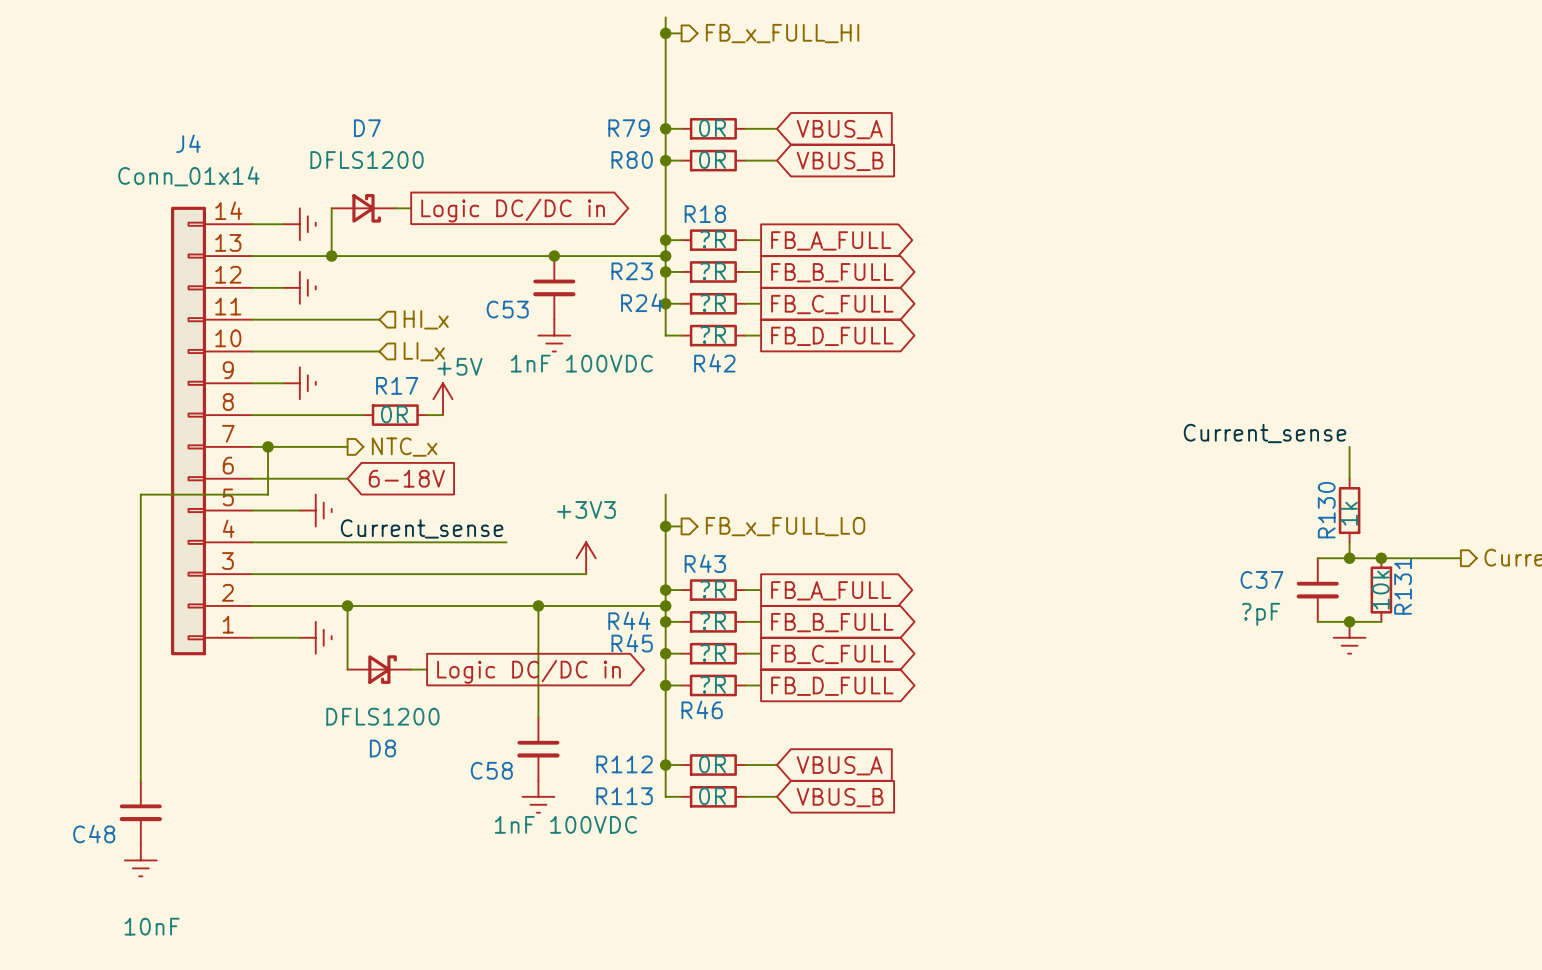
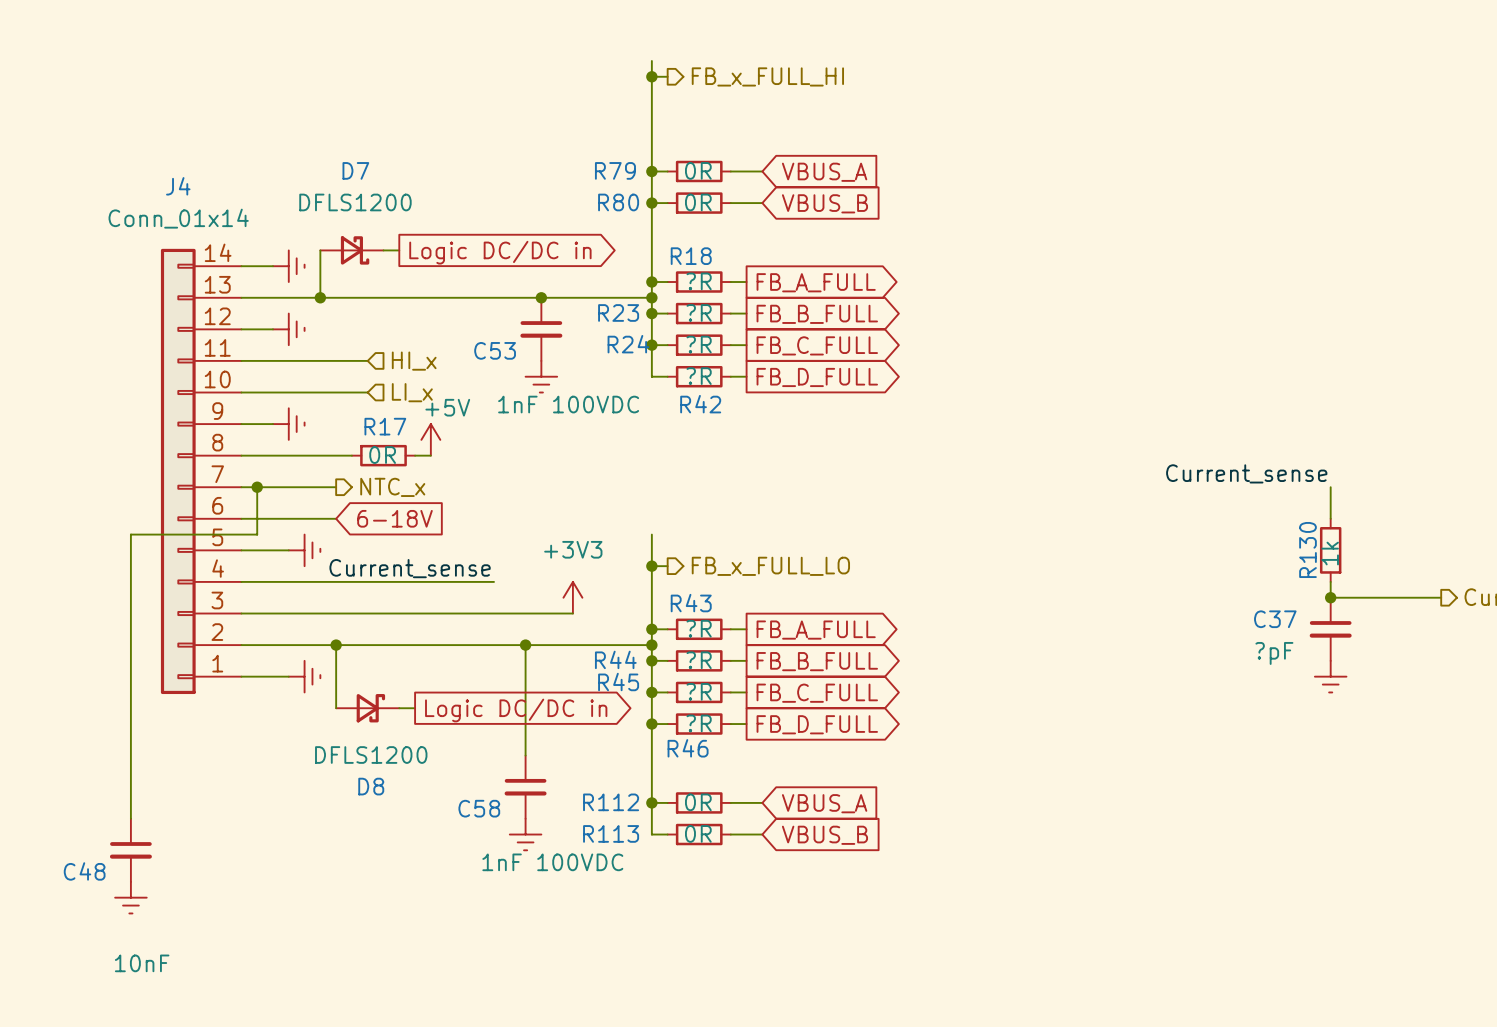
wire: (1317, 558) (1349, 558) -> none
junction: (1381, 558) -> none
C37 position: (1317, 590) -> (1330, 629)
R131: 10k (1381, 590) -> none
wire: (1317, 621) (1381, 621) -> none
junction: (1349, 621) -> none

